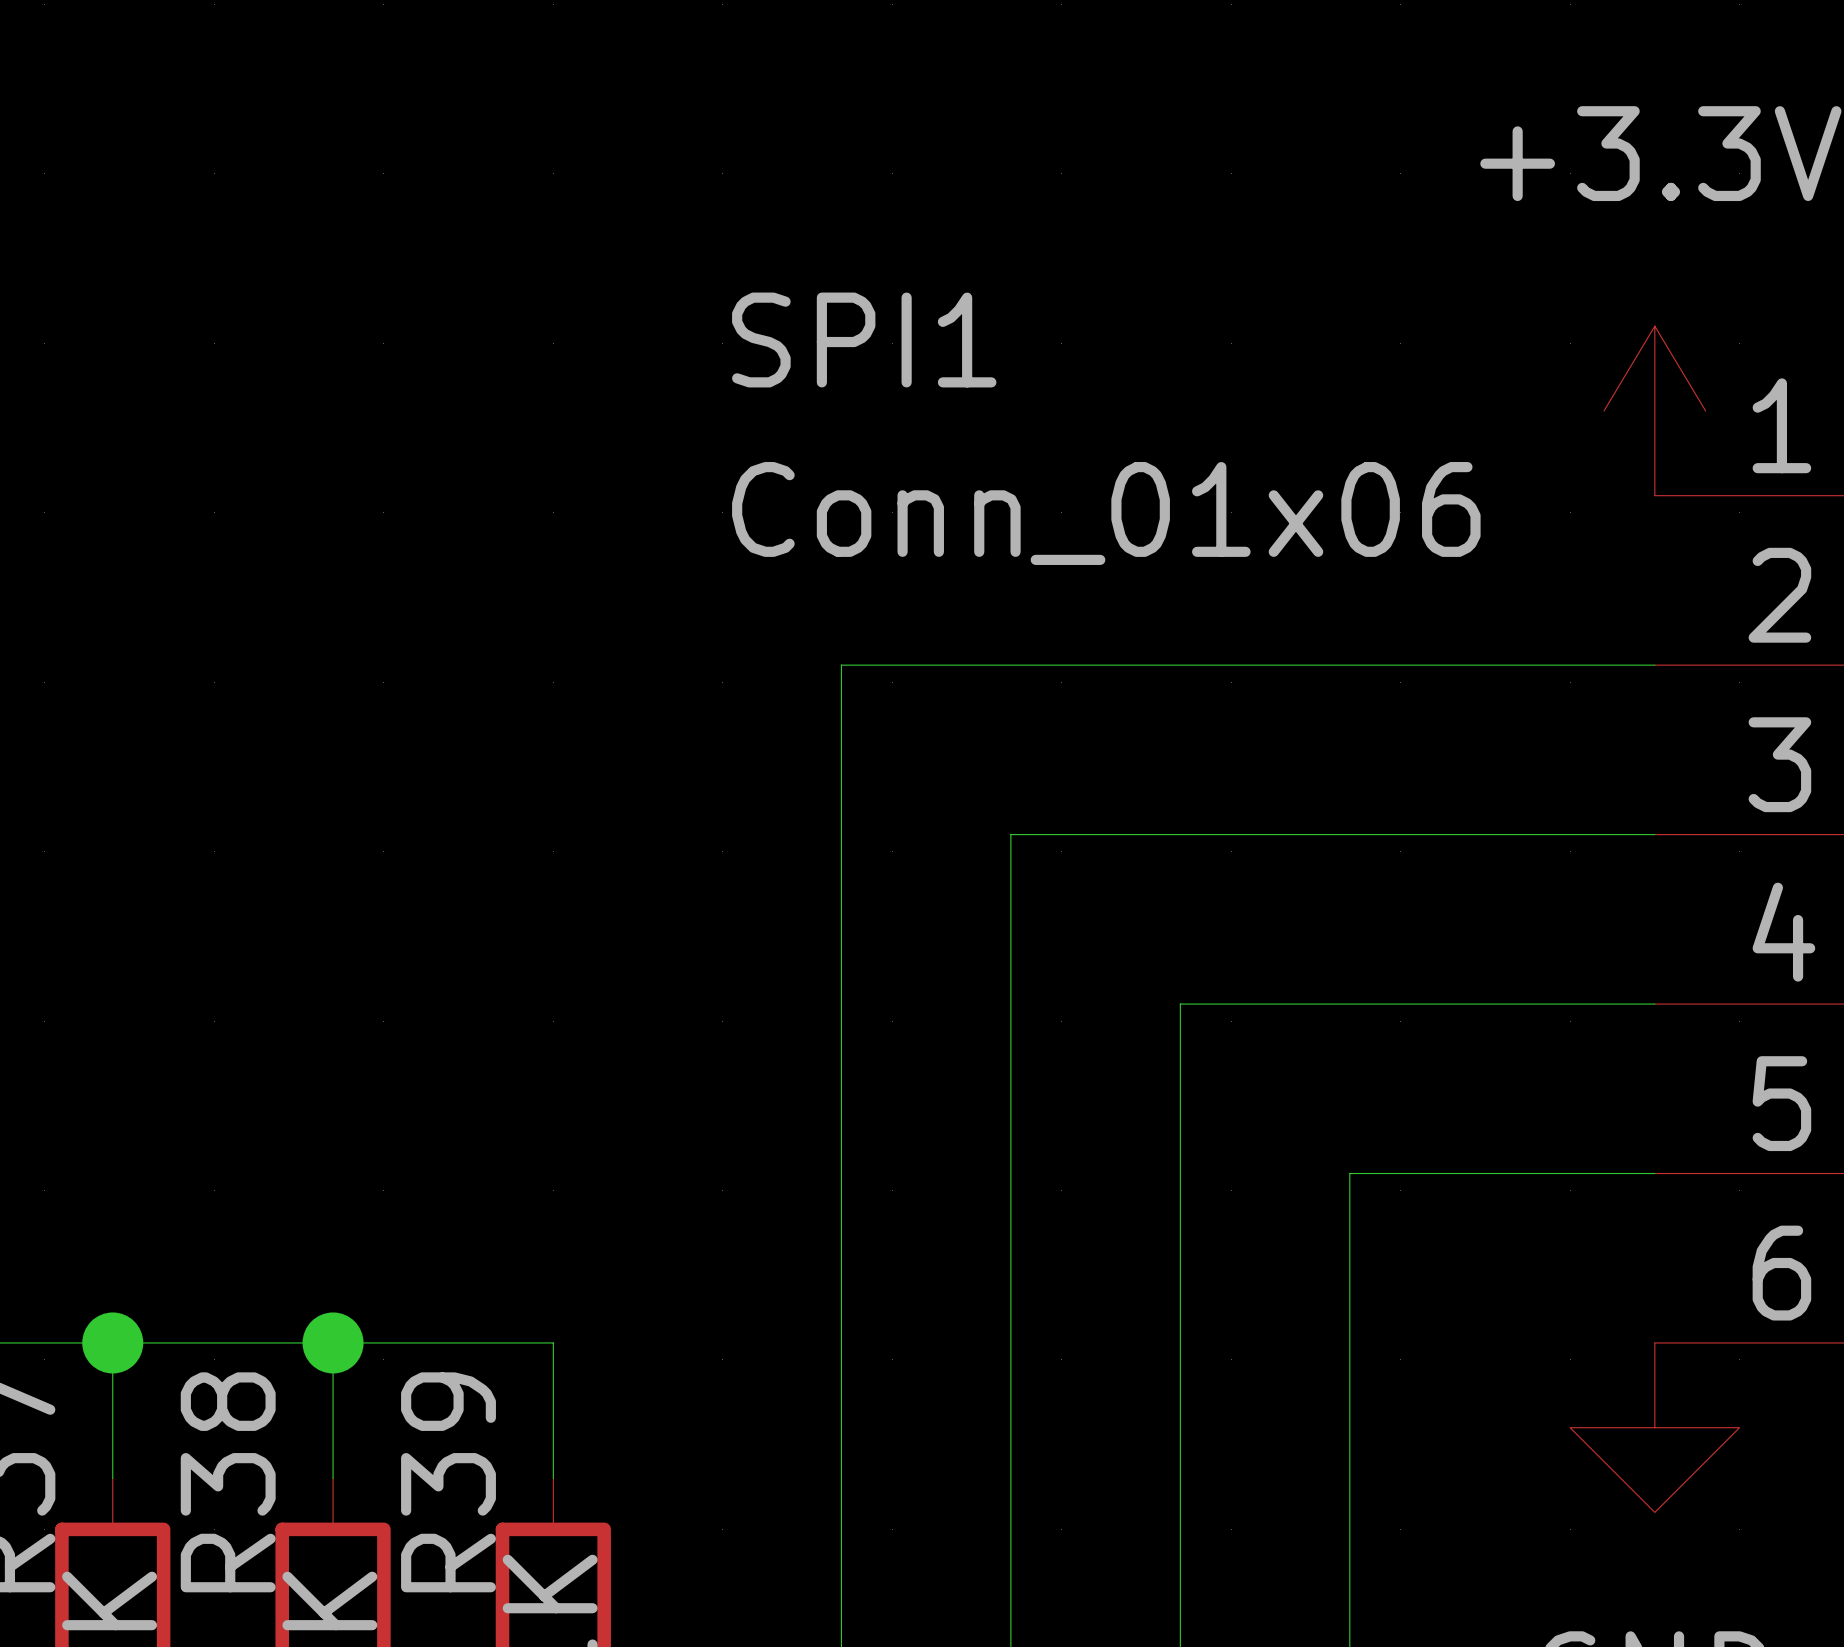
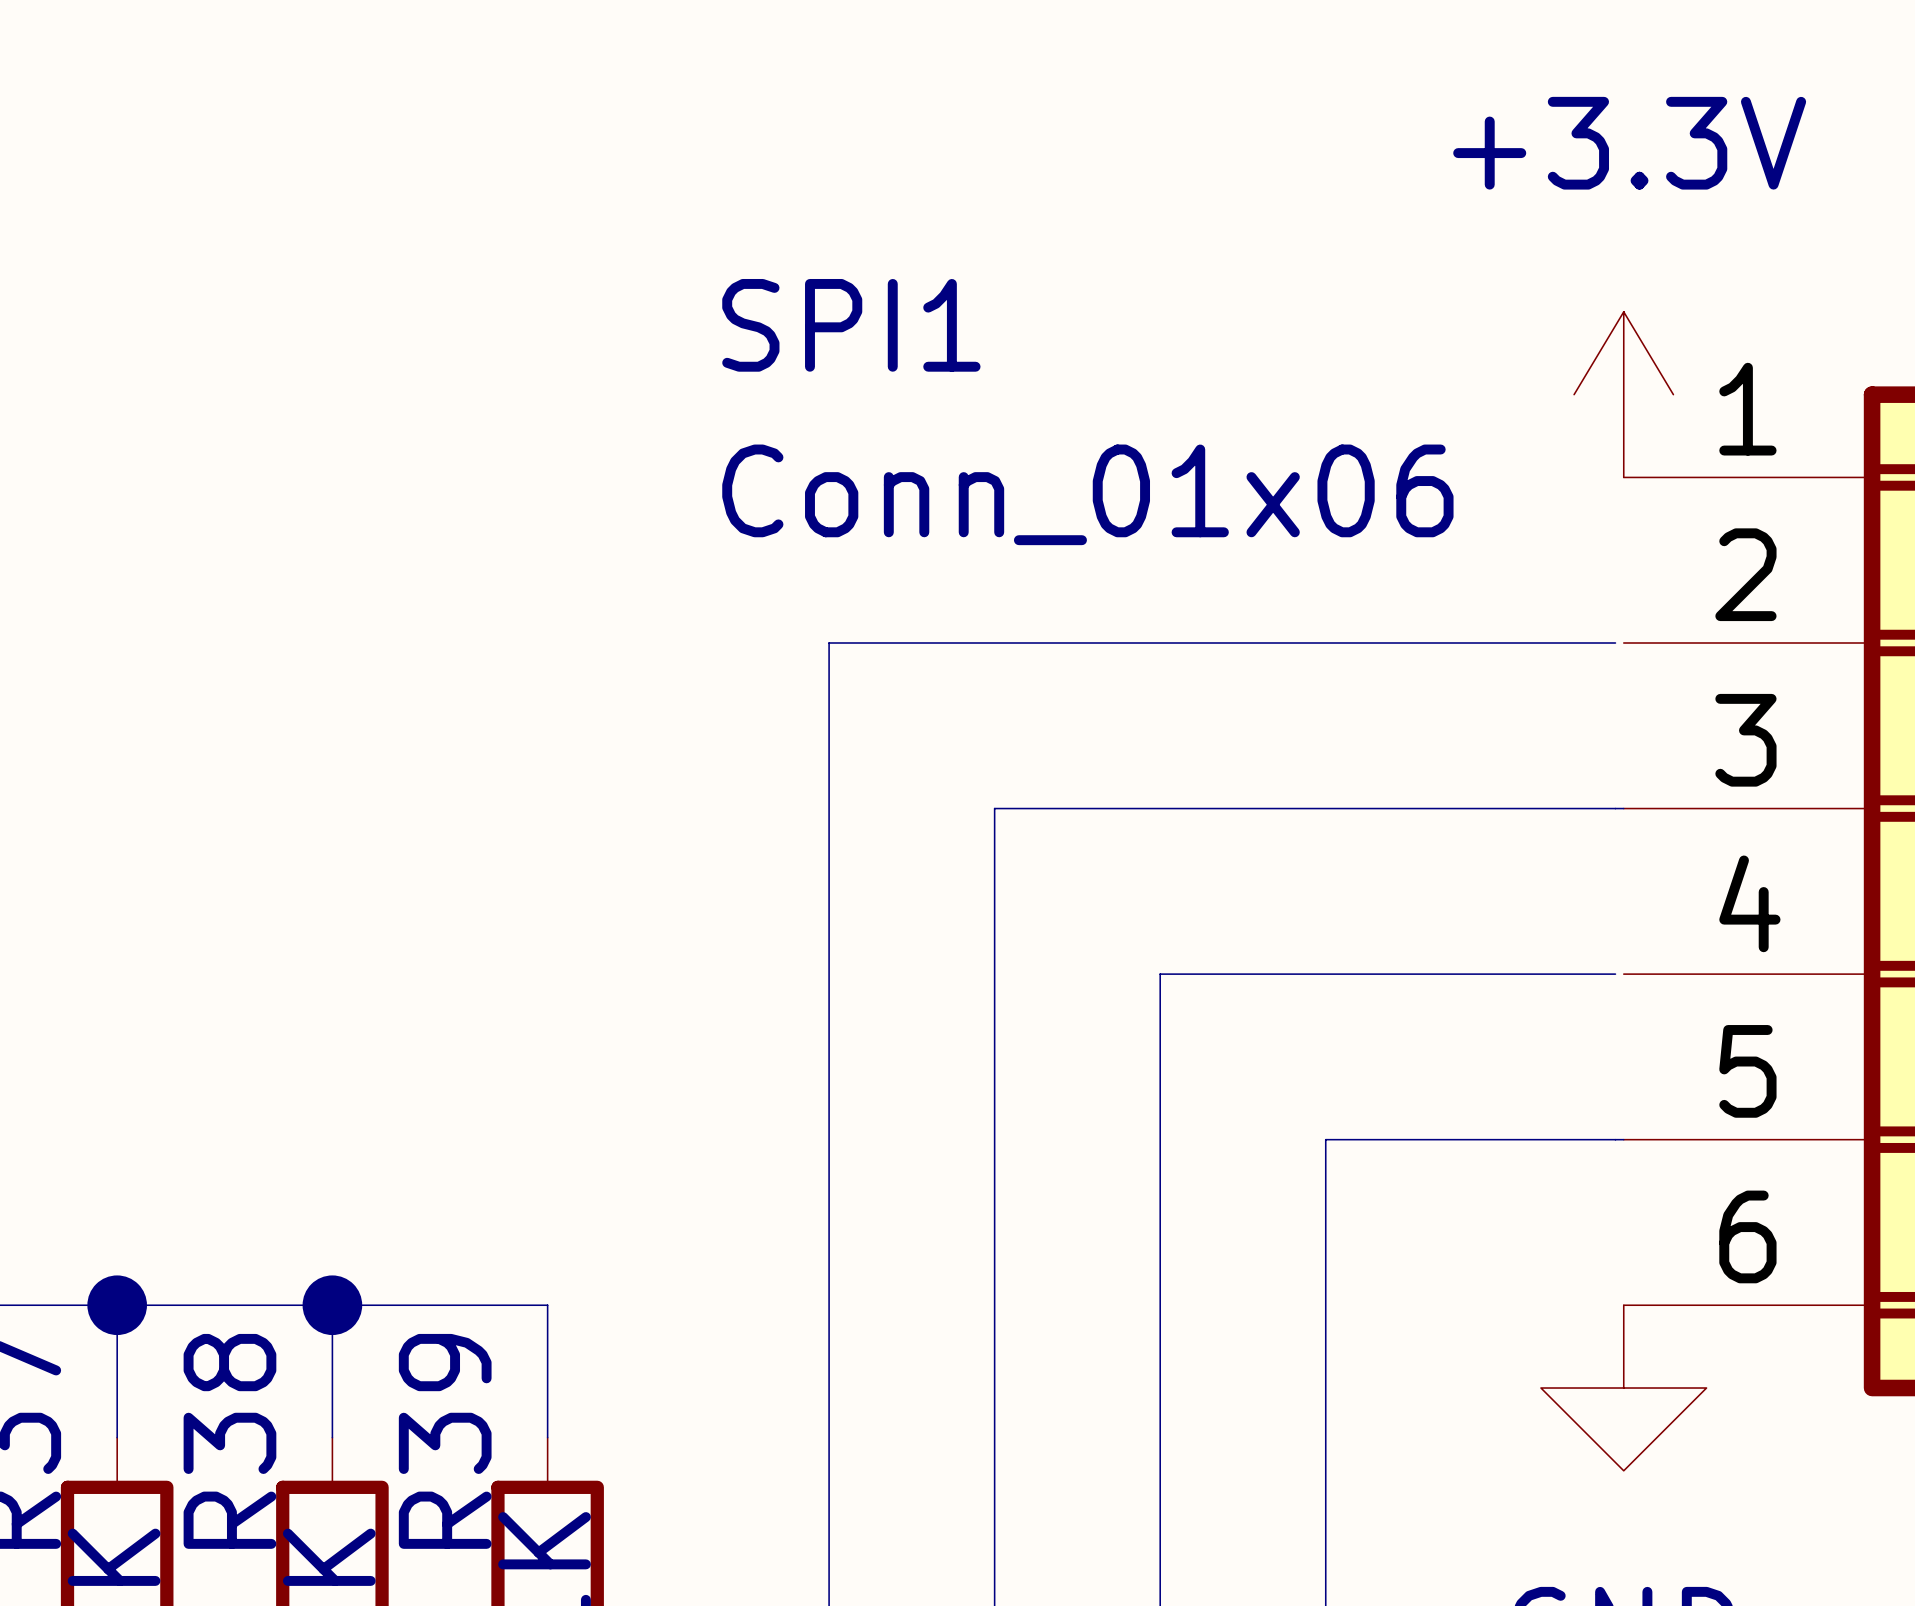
wire: (1646, 665) (1654, 665) -> none
wire: (1646, 1004) (1654, 1004) -> none

